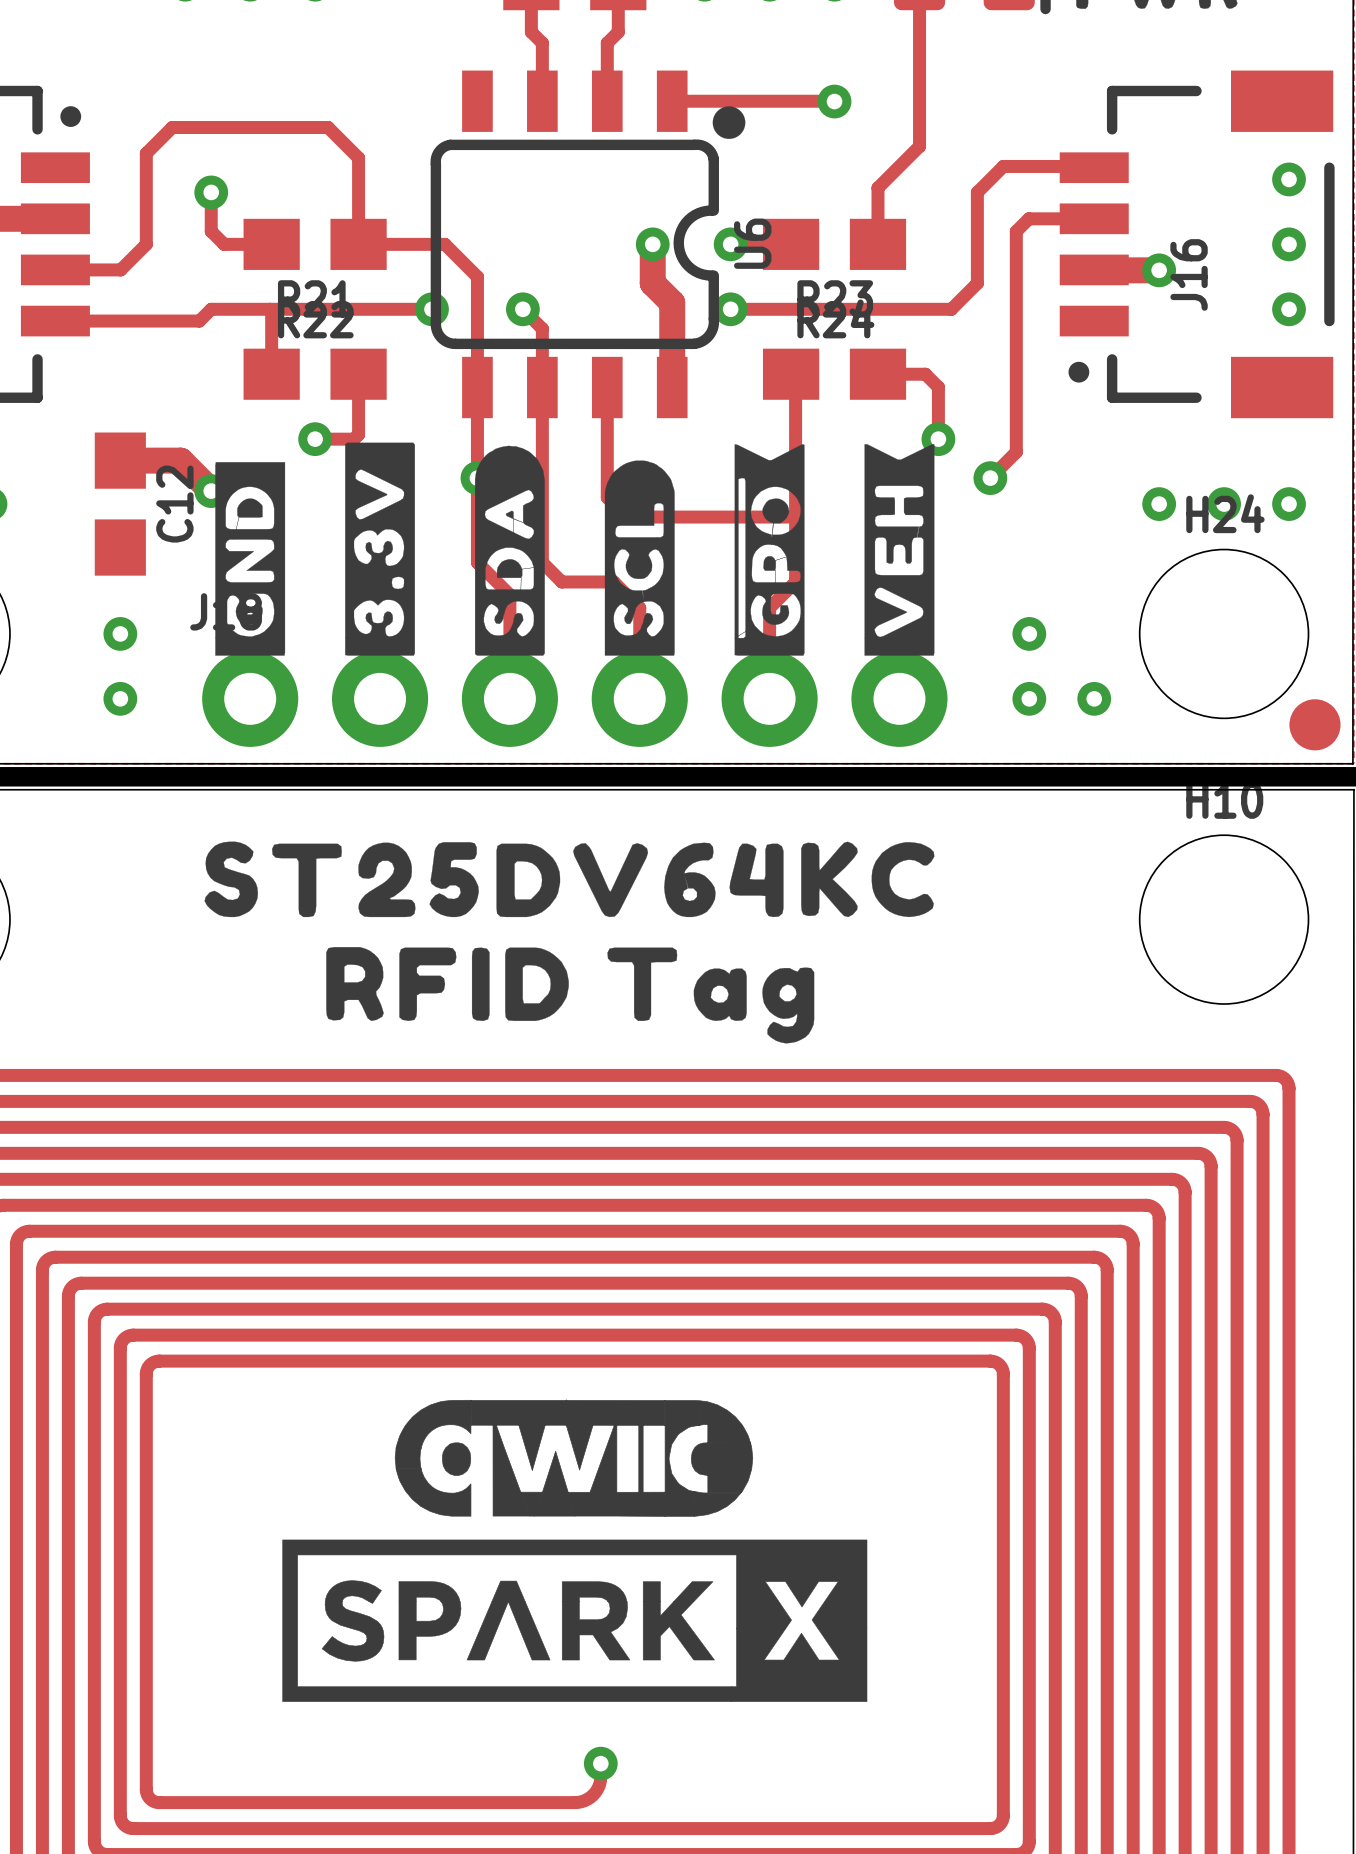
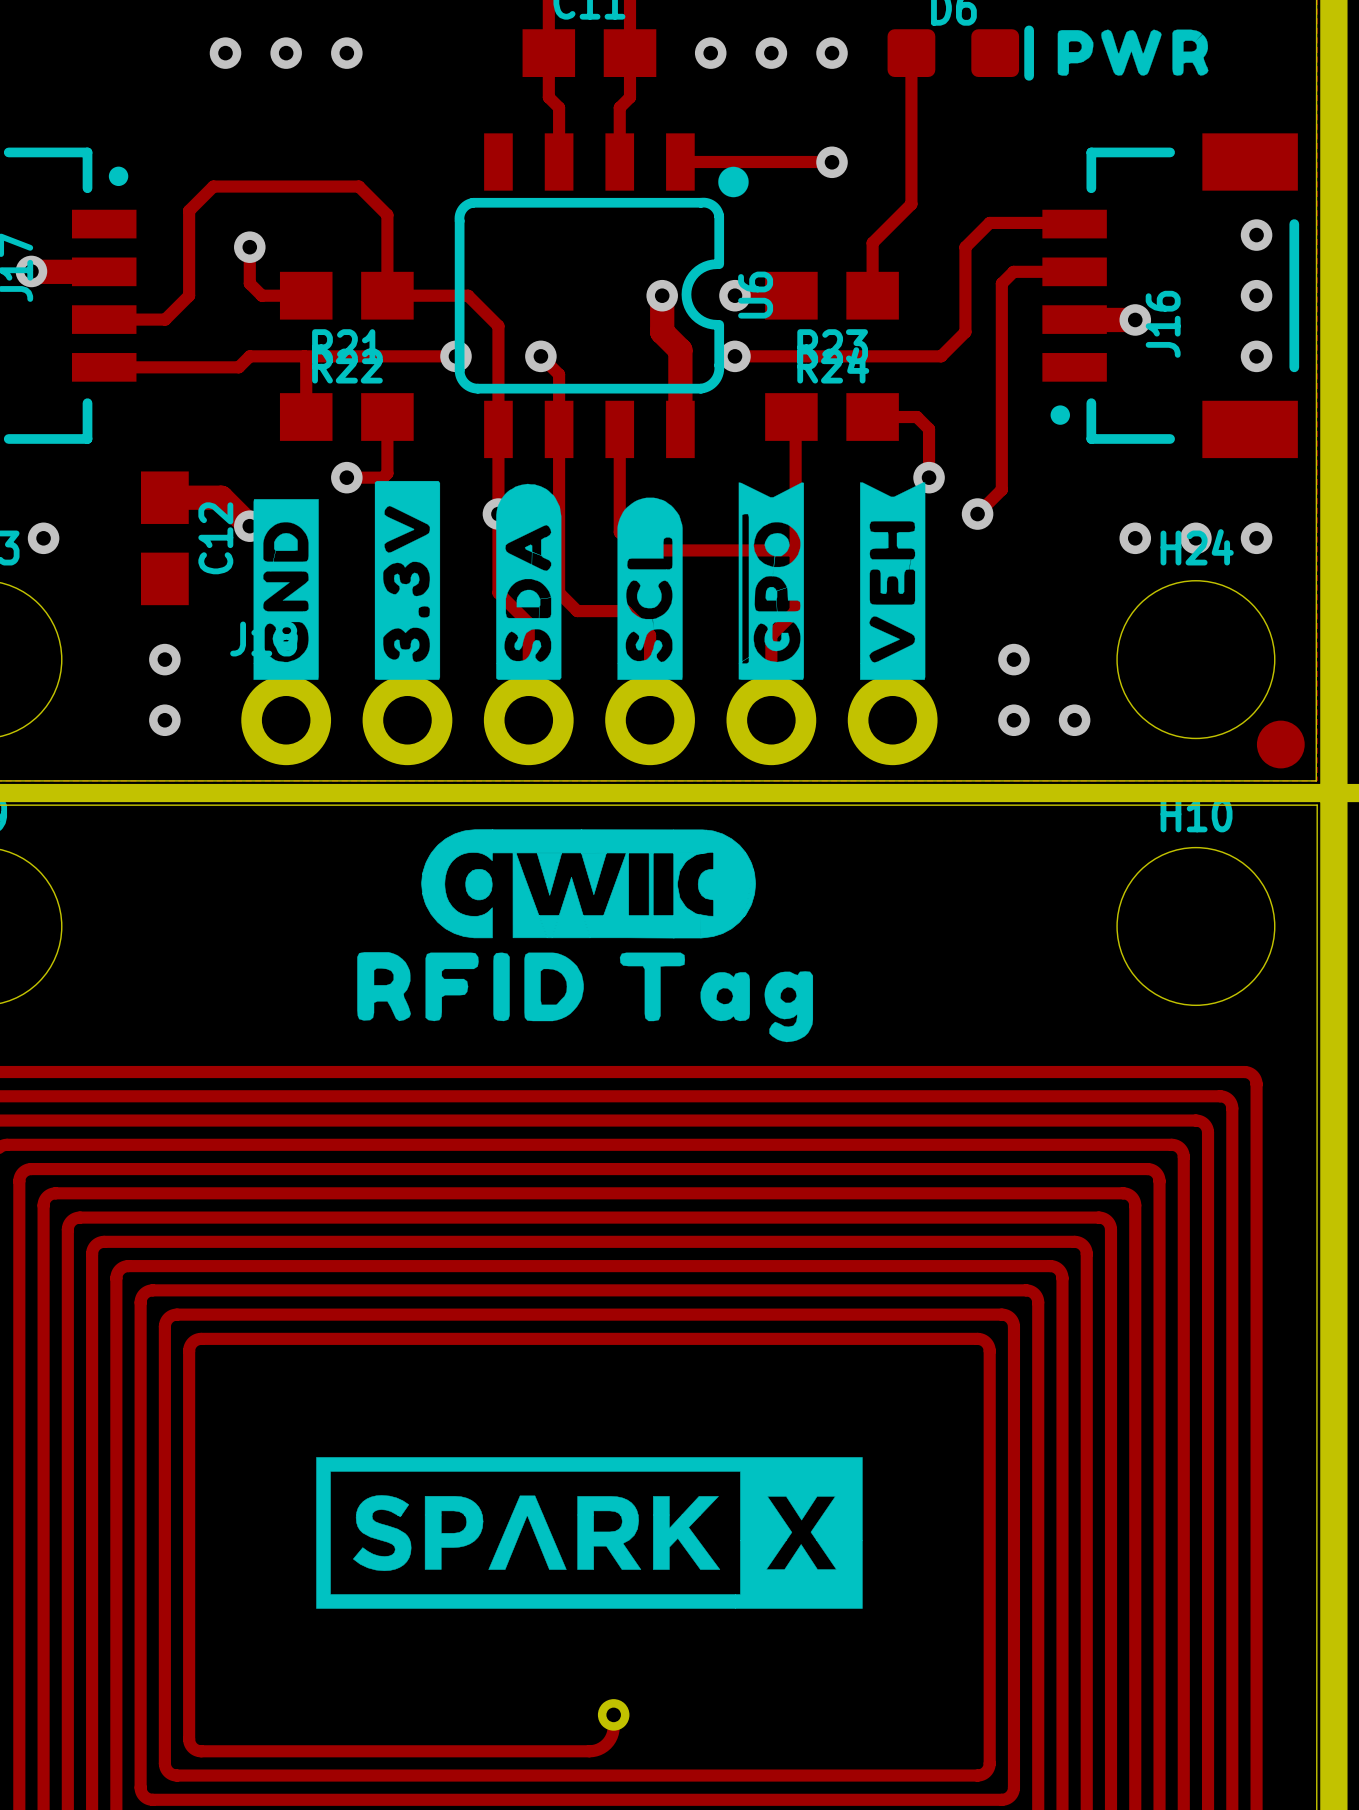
drawing: [204, 841, 935, 918] -> none
drawing position: (573, 1458) -> (588, 883)
drawing position: (574, 1620) -> (589, 1532)

